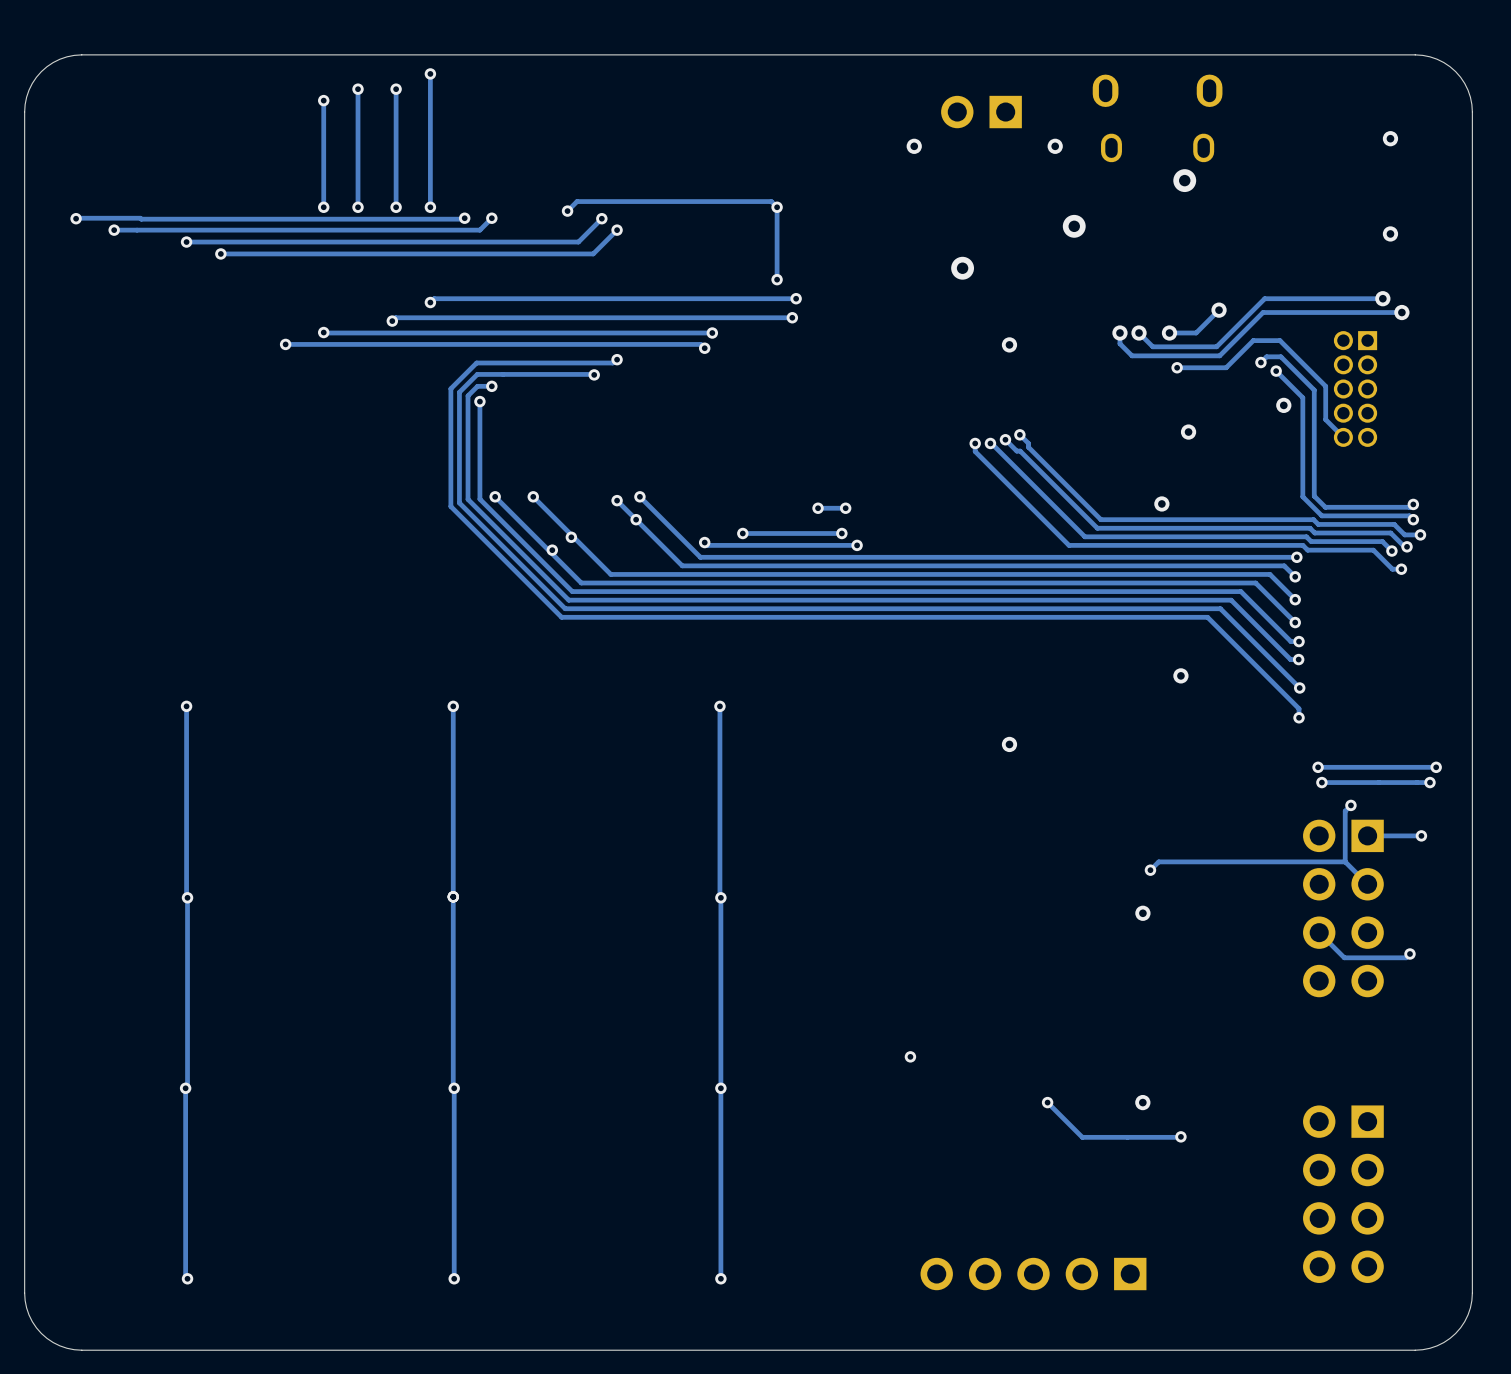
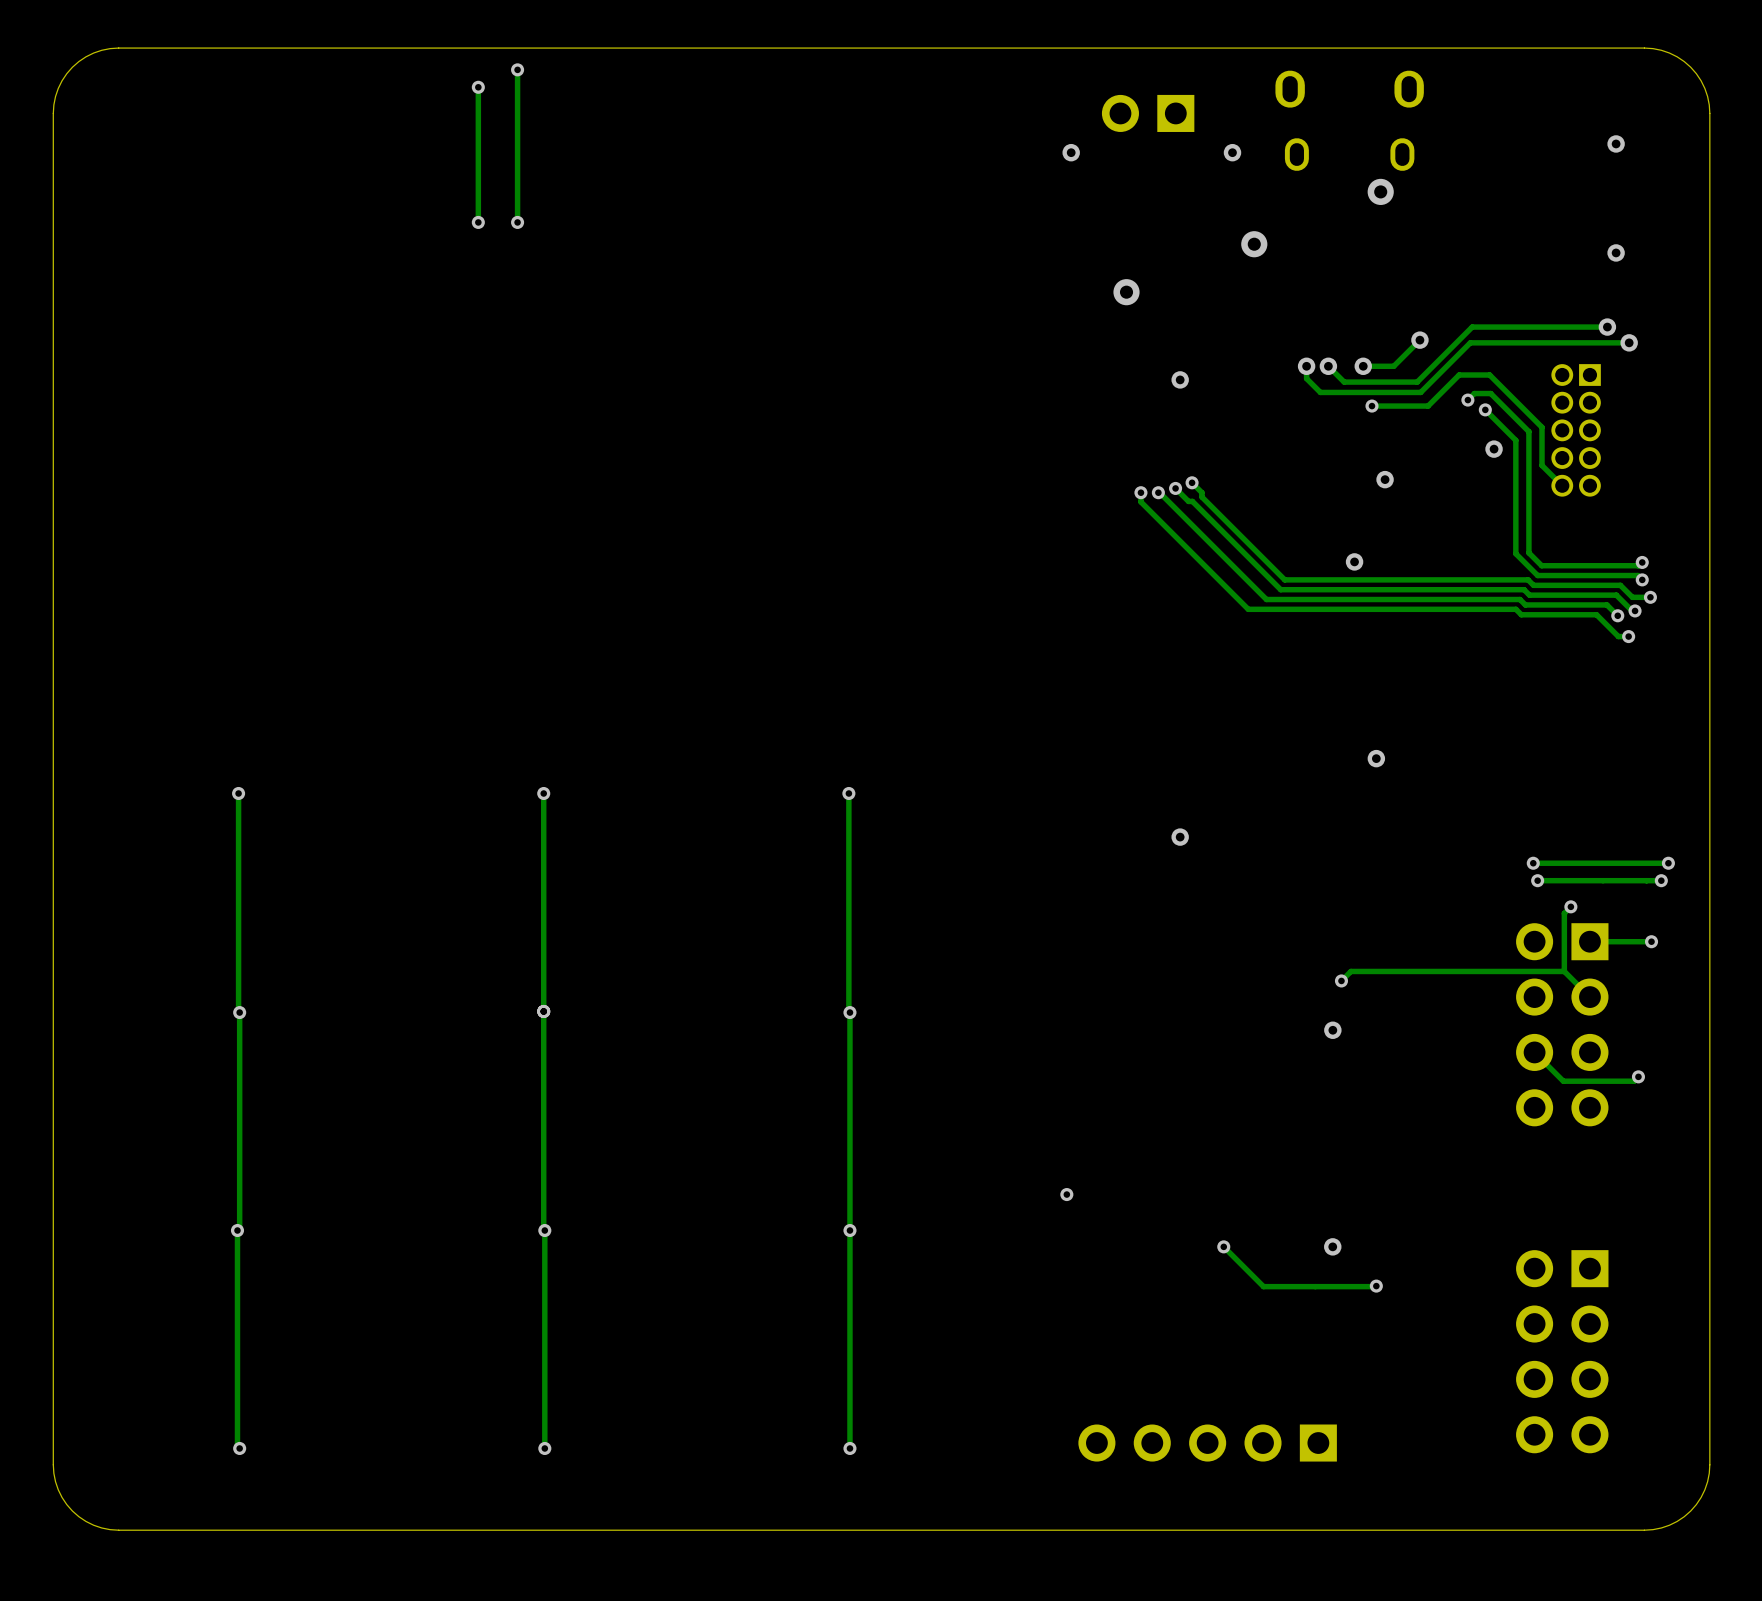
track: (358, 89) (358, 207) -> none
via: (358, 89) -> none
track: (323, 100) (323, 207) -> none
via: (323, 100) -> none
via: (323, 207) -> none
via: (358, 207) -> none
via: (777, 207) -> none
track: (567, 211) (577, 201) (771, 201) (777, 207) (777, 279) -> none
via: (567, 211) -> none
via: (76, 218) -> none
track: (464, 218) (76, 218) -> none
via: (464, 218) -> none
track: (491, 218) (479, 230) (114, 230) -> none
via: (491, 218) -> none
track: (601, 218) (578, 242) (186, 242) -> none
via: (601, 218) -> none
via: (114, 230) -> none
track: (617, 230) (593, 253) (220, 253) -> none
via: (617, 230) -> none
via: (186, 242) -> none
via: (220, 253) -> none
via: (777, 279) -> none
track: (796, 298) (434, 298) (430, 302) -> none
via: (796, 298) -> none
via: (430, 302) -> none
track: (792, 317) (395, 317) (392, 321) -> none
via: (792, 317) -> none
via: (392, 321) -> none
track: (323, 332) (712, 333) -> none
via: (323, 332) -> none
via: (712, 333) -> none
track: (285, 344) (700, 344) (704, 348) -> none
via: (285, 344) -> none
via: (704, 348) -> none
track: (617, 359) (612, 363) (476, 363) (450, 388) (450, 506) (561, 617) (1207, 617) (1299, 708) (1299, 717) -> none
via: (617, 359) -> none
track: (594, 374) (477, 374) (459, 392) (459, 502) (565, 608) (1220, 608) (1299, 687) -> none
via: (594, 374) -> none
track: (491, 386) (477, 386) (468, 395) (468, 499) (568, 600) (1231, 600) (1290, 659) (1298, 659) -> none
via: (491, 386) -> none
track: (479, 401) (479, 499) (572, 591) (1240, 591) (1290, 641) (1299, 641) -> none
via: (479, 401) -> none
track: (495, 496) (581, 583) (1255, 583) (1295, 622) -> none
via: (495, 496) -> none
track: (533, 496) (610, 574) (1269, 574) (1295, 599) -> none
via: (533, 496) -> none
track: (639, 496) (700, 557) (1296, 557) -> none
via: (639, 496) -> none
track: (617, 500) (682, 565) (1284, 565) (1295, 576) -> none
via: (617, 500) -> none
via: (818, 508) -> none
track: (845, 508) (818, 508) -> none
via: (845, 508) -> none
via: (636, 519) -> none
via: (742, 533) -> none
track: (841, 533) (742, 533) -> none
via: (841, 533) -> none
via: (571, 537) -> none
track: (704, 542) (707, 545) (857, 545) -> none
via: (704, 542) -> none
via: (857, 545) -> none
via: (552, 550) -> none
via: (1296, 557) -> none
via: (1295, 576) -> none
via: (1295, 599) -> none
via: (1295, 622) -> none
via: (1299, 641) -> none
via: (1298, 659) -> none
via: (1299, 687) -> none
via: (1299, 717) -> none

